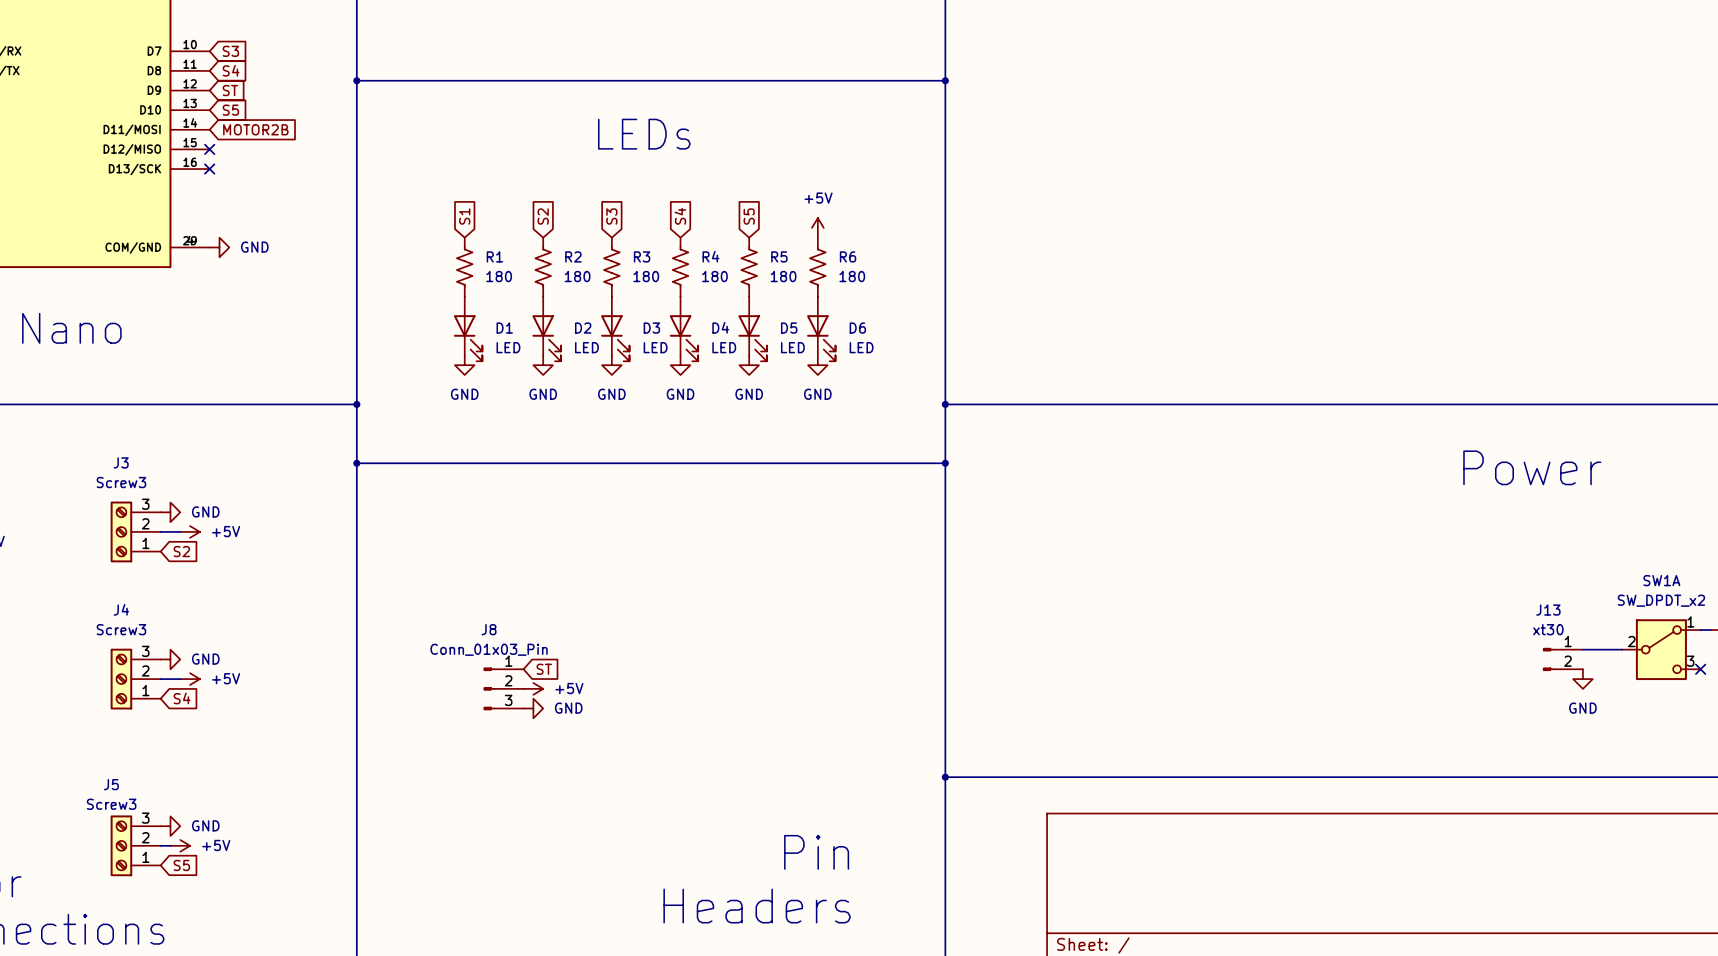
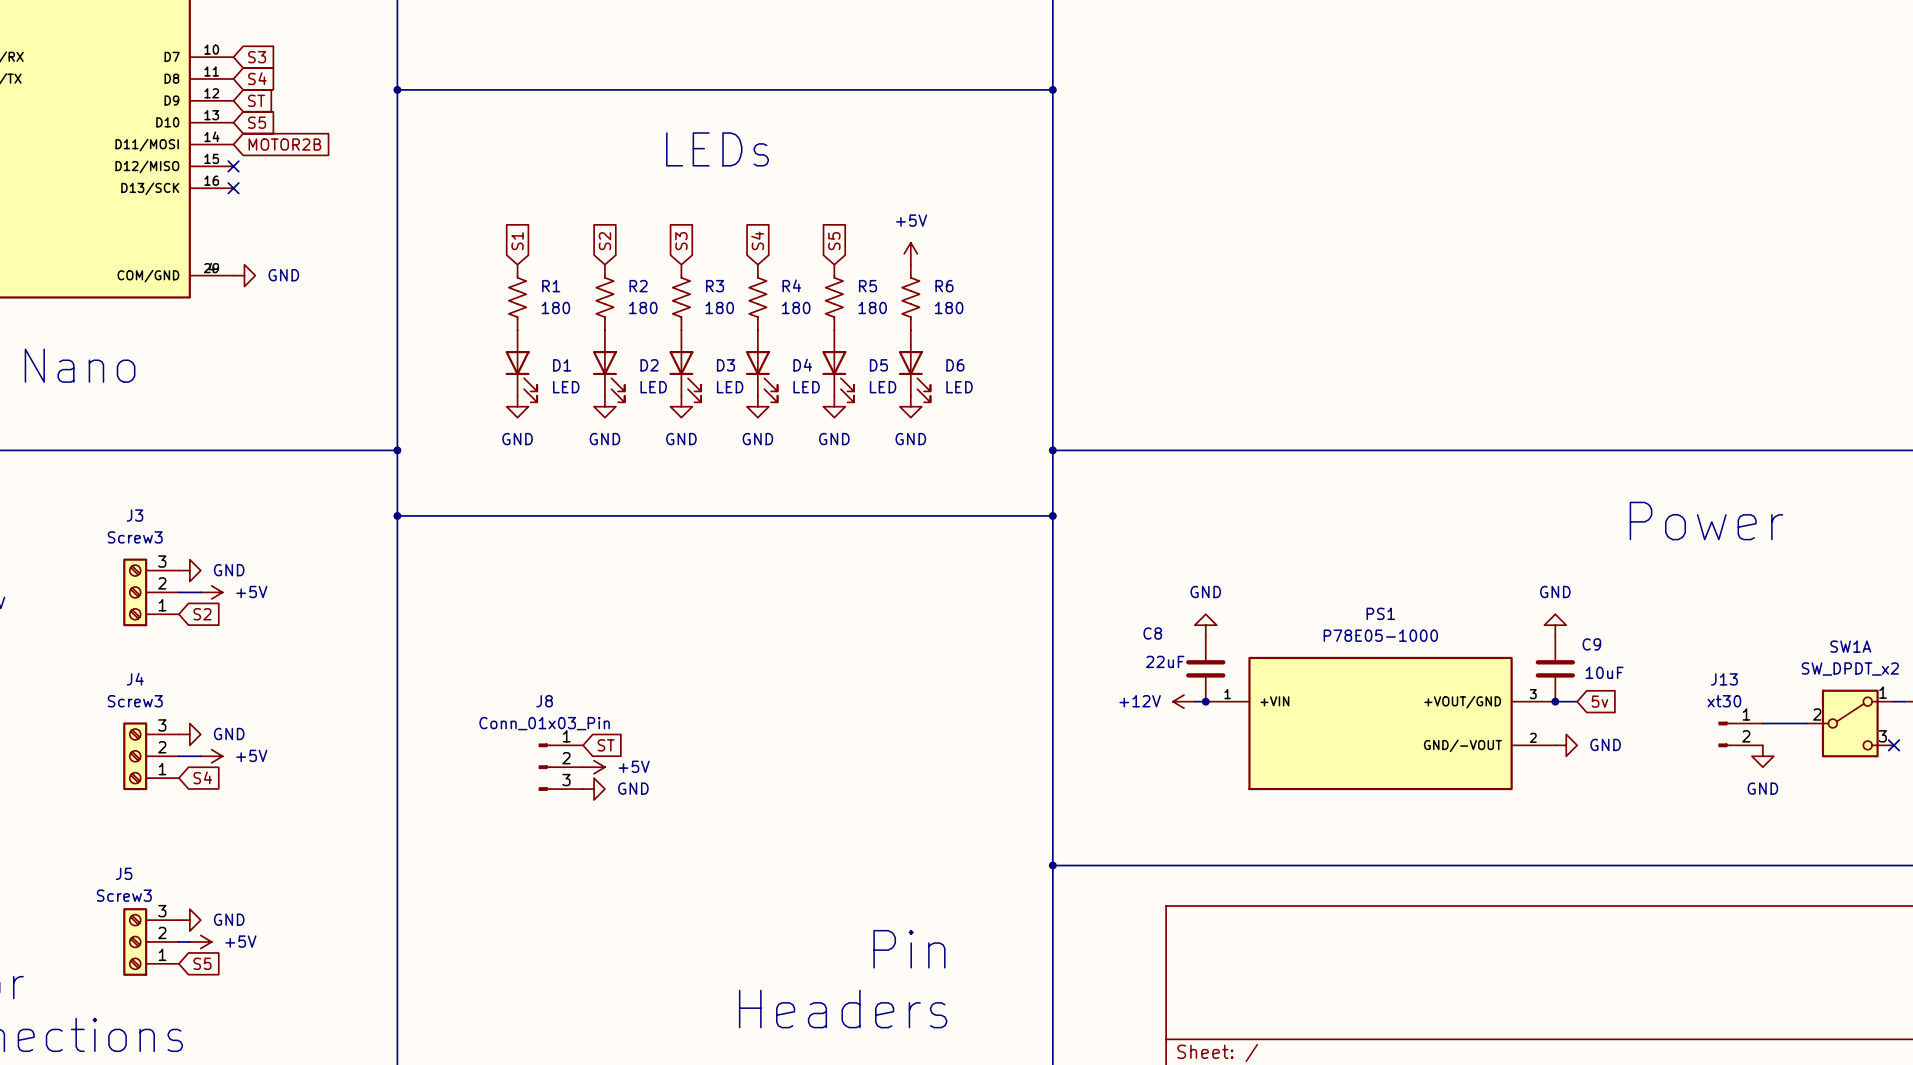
power symbol: none -> GND (1205, 625)
power symbol: none -> GND (1555, 625)
C8: none -> 22uF (1205, 668)
C9: none -> 10uF (1555, 668)
power symbol: none -> +12V (1183, 701)
wire: none -> (1194, 701) (1205, 701)
junction: none -> (1205, 701)
wire: none -> (1555, 701) (1577, 701)
junction: none -> (1555, 701)
global label: none -> 5v (1599, 701)
PS1: none -> P78E05-1000 (1380, 723)
power symbol: none -> GND (1566, 745)

